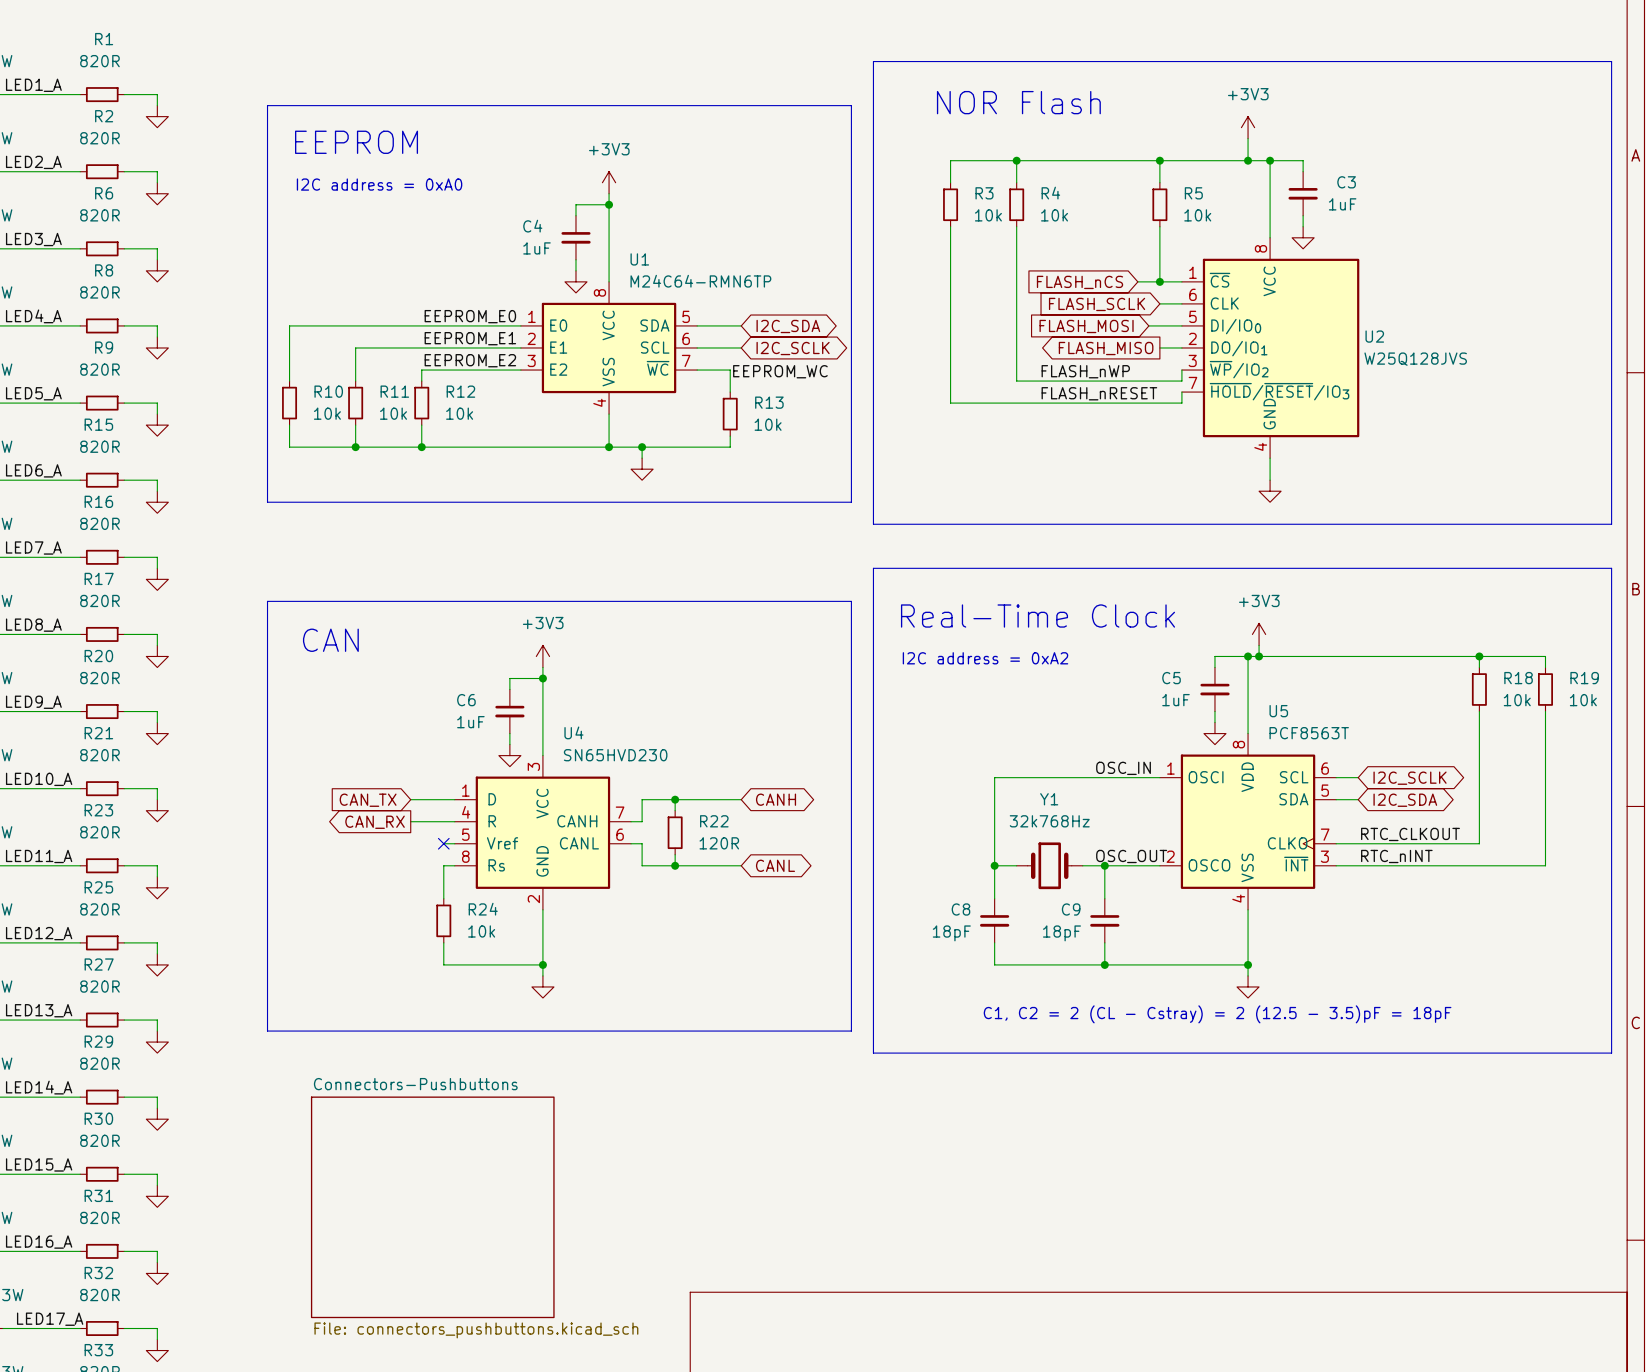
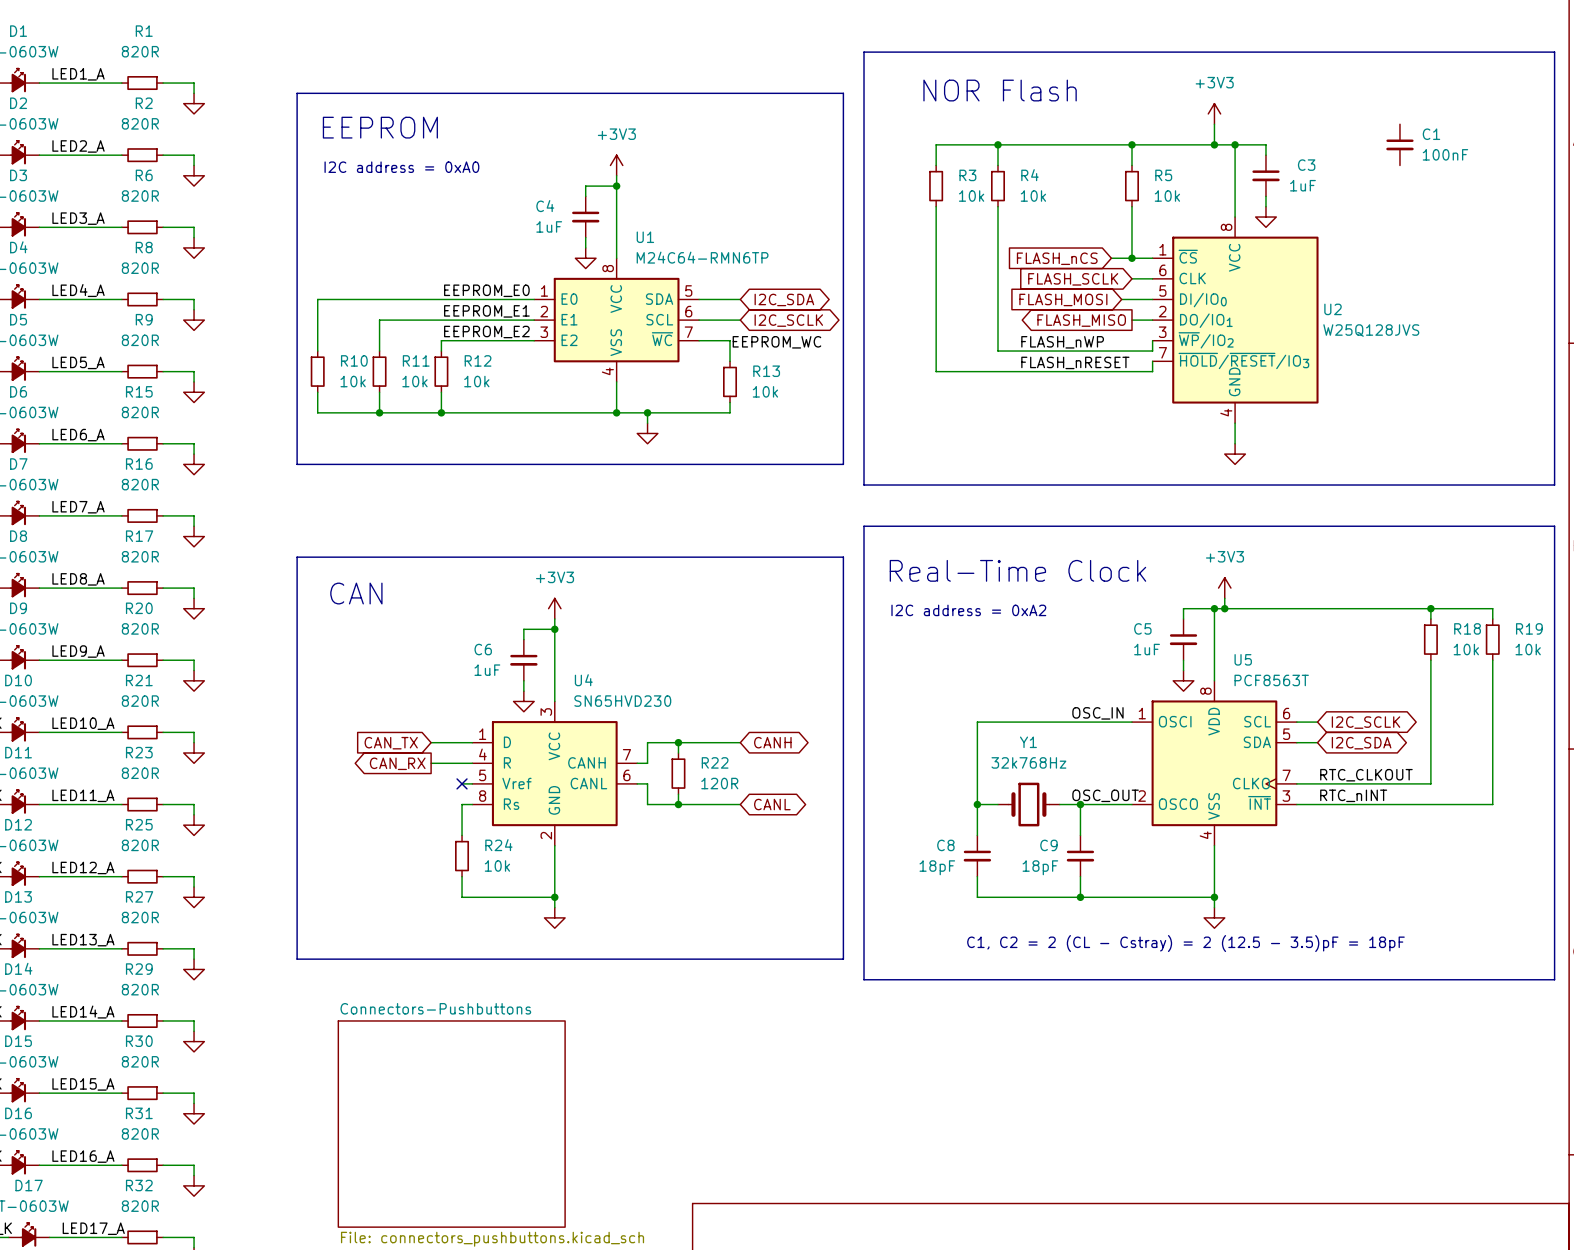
C1: none -> 100nF (1399, 144)

